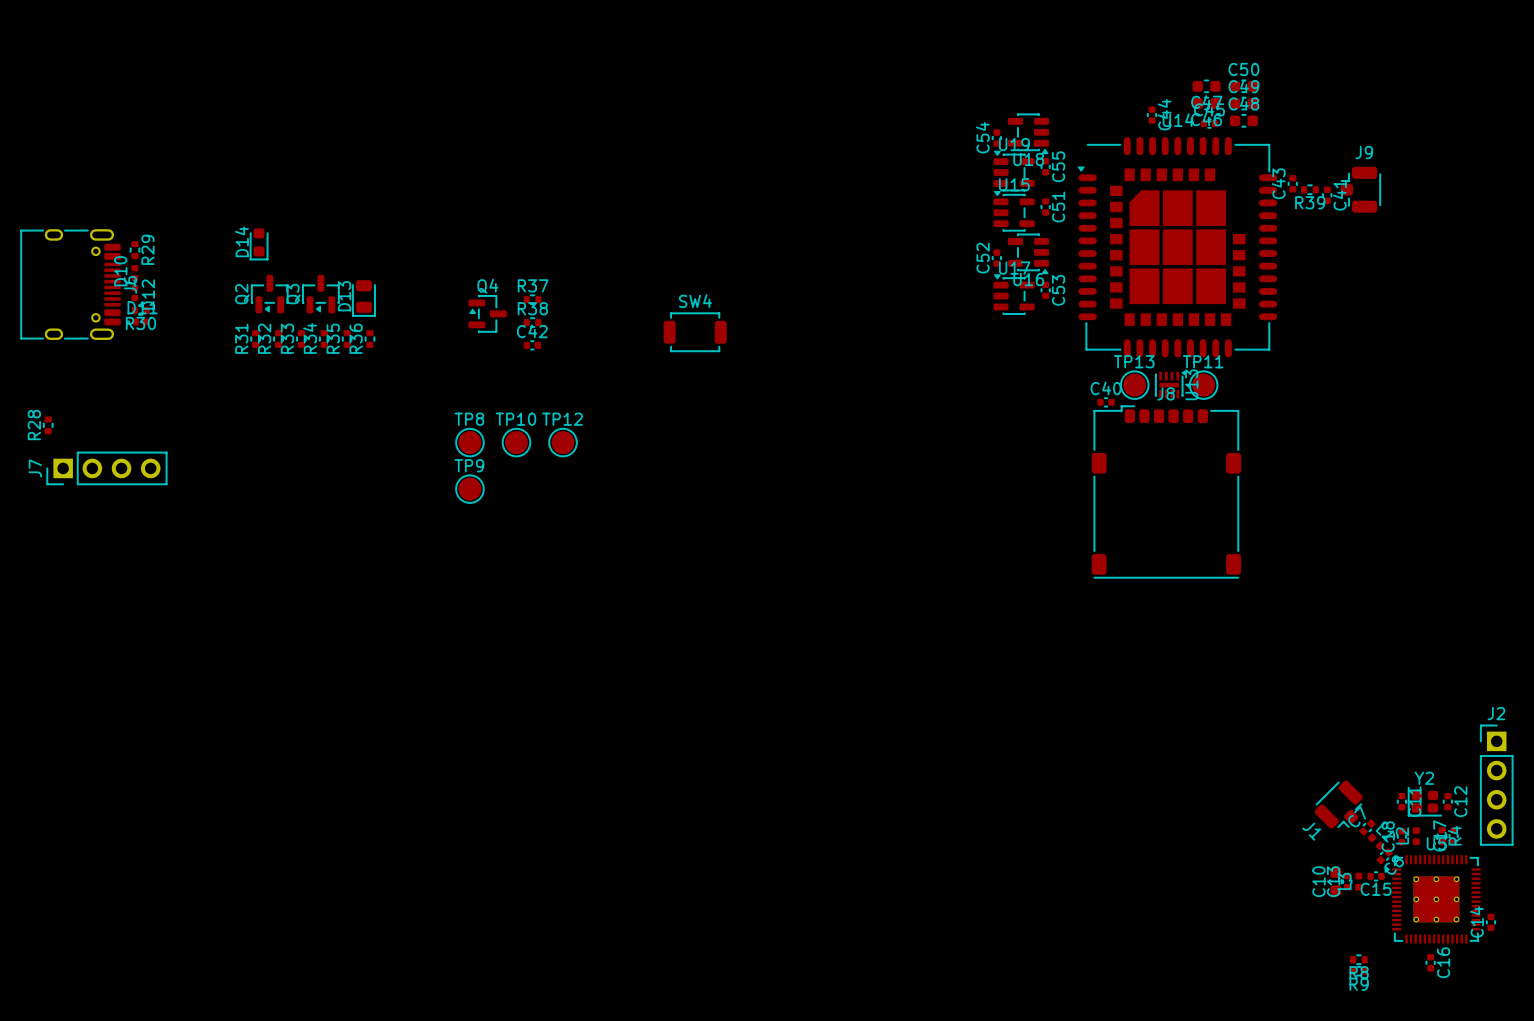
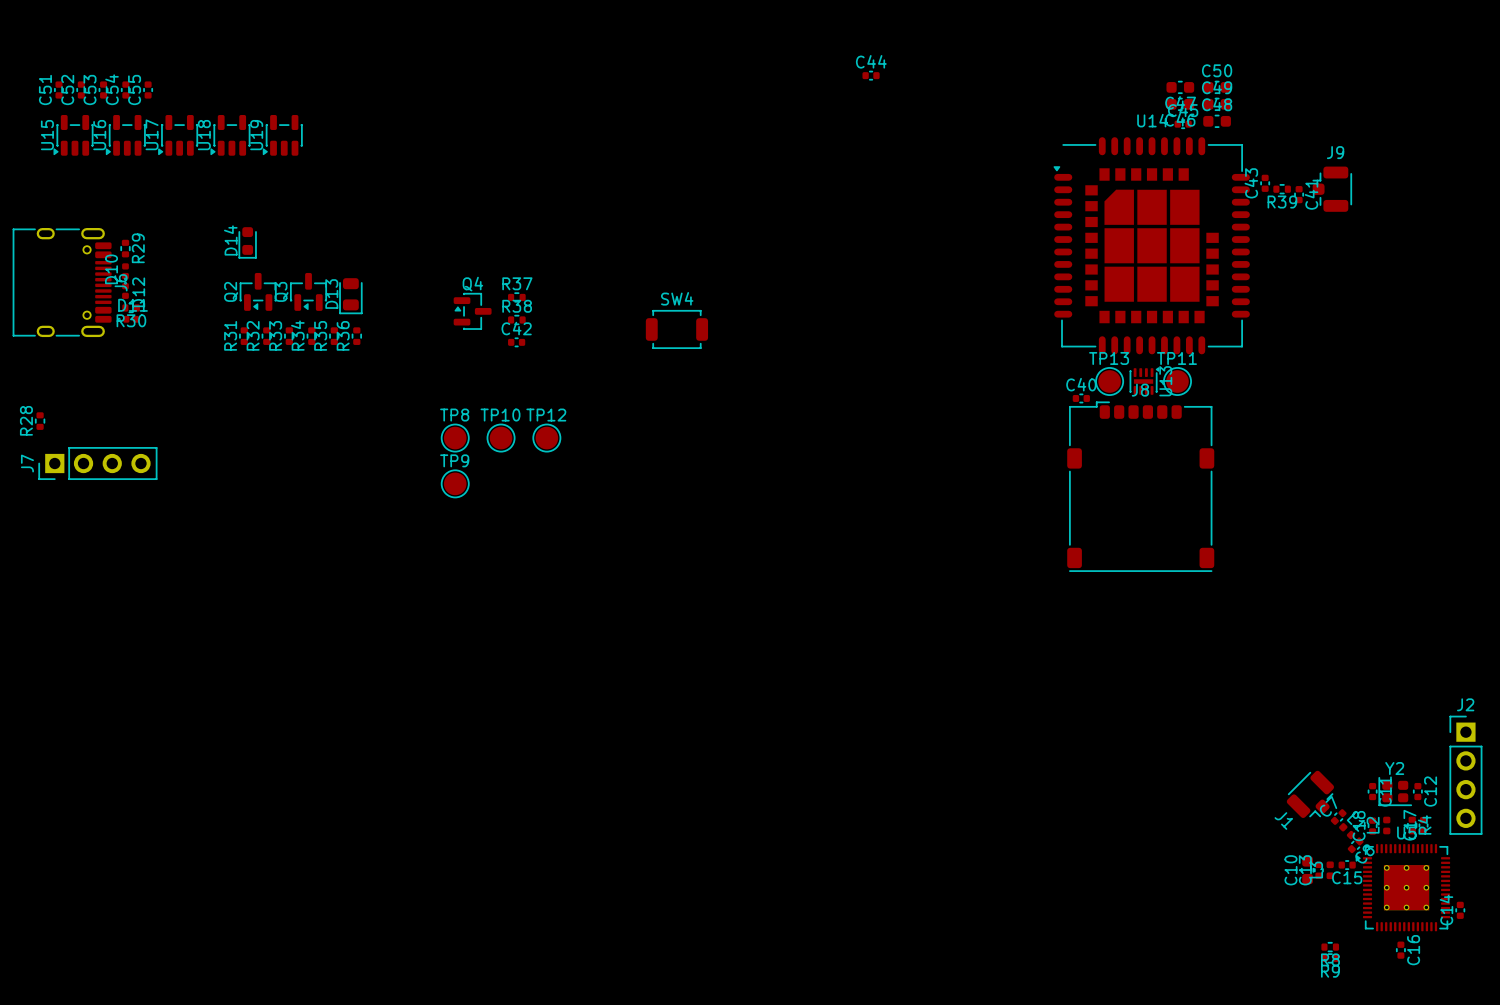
C44 rotation: 0° (1151, 115) -> 90° clockwise (871, 75)
C44 position: (1151, 115) -> (871, 75)
U18 rotation: 0° (1028, 133) -> 90° clockwise (230, 135)
U18 position: (1028, 133) -> (230, 135)
C54 position: (996, 138) -> (125, 89)
C55 position: (1045, 166) -> (148, 89)
C55 name position: C55 (1058, 166) -> C55 (134, 89)
U19 rotation: 0° (1014, 170) -> 90° counterclockwise (282, 135)
U19 position: (1014, 170) -> (282, 135)
C51 position: (1045, 207) -> (58, 89)
C51 name position: C51 (1058, 207) -> C51 (45, 89)
U15 rotation: 0° (1014, 211) -> 90° counterclockwise (73, 135)
U15 position: (1014, 211) -> (73, 135)
U16 rotation: 0° (1028, 254) -> 90° clockwise (125, 135)
U16 position: (1028, 254) -> (125, 135)
C52 position: (996, 258) -> (81, 89)
C53 position: (1045, 290) -> (103, 89)
C53 name position: C53 (1058, 290) -> C53 (90, 89)
U17 rotation: 0° (1014, 294) -> 90° counterclockwise (178, 135)
U17 position: (1014, 294) -> (178, 135)

